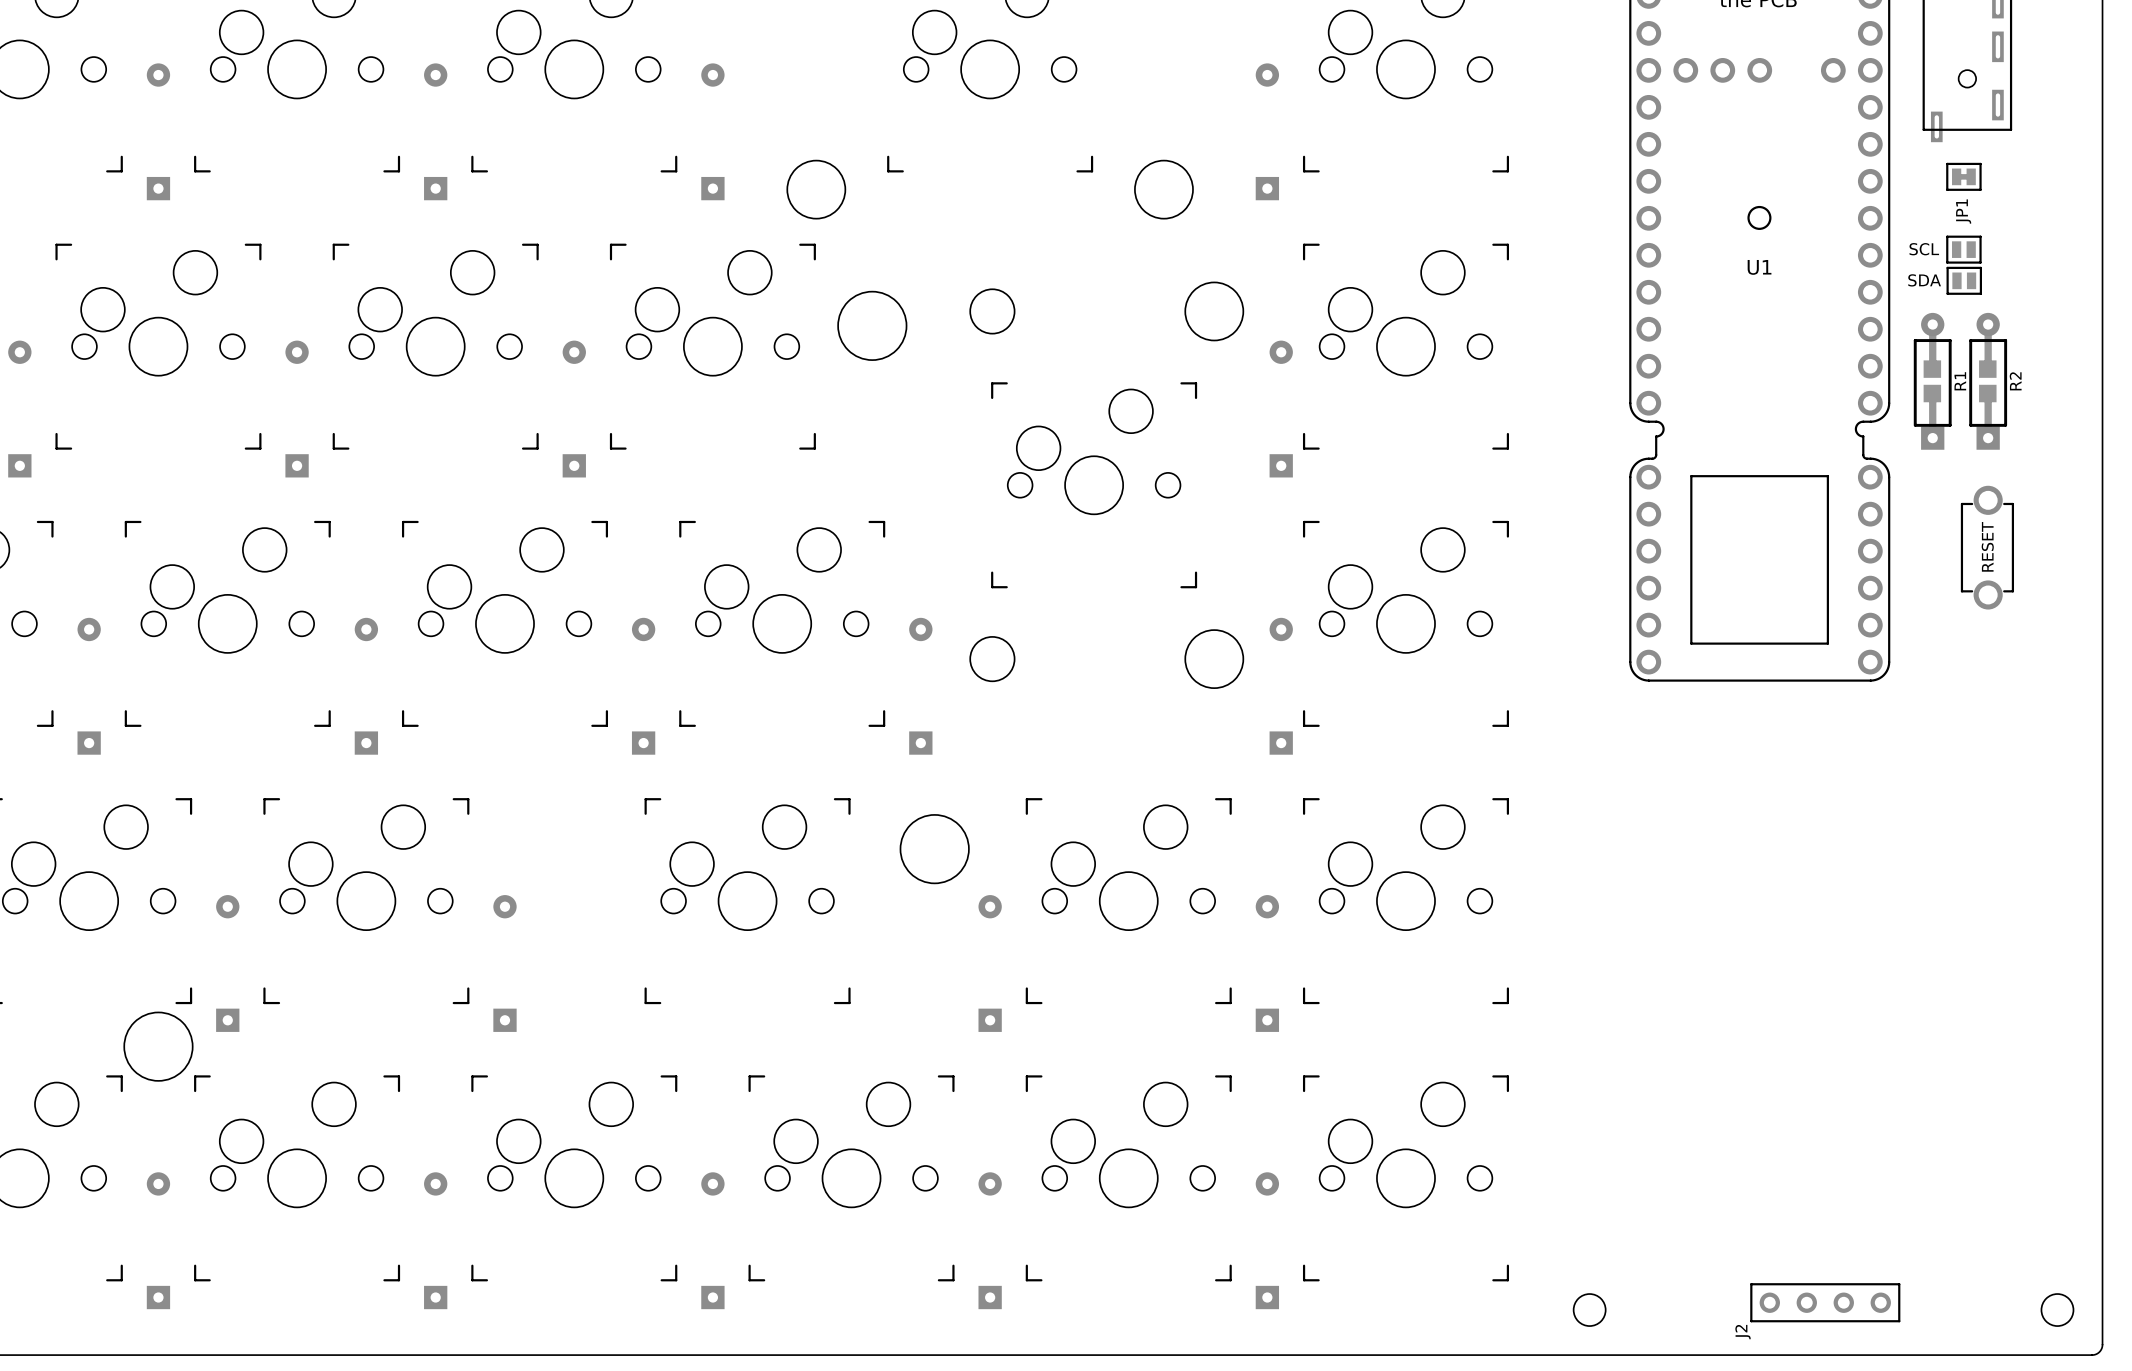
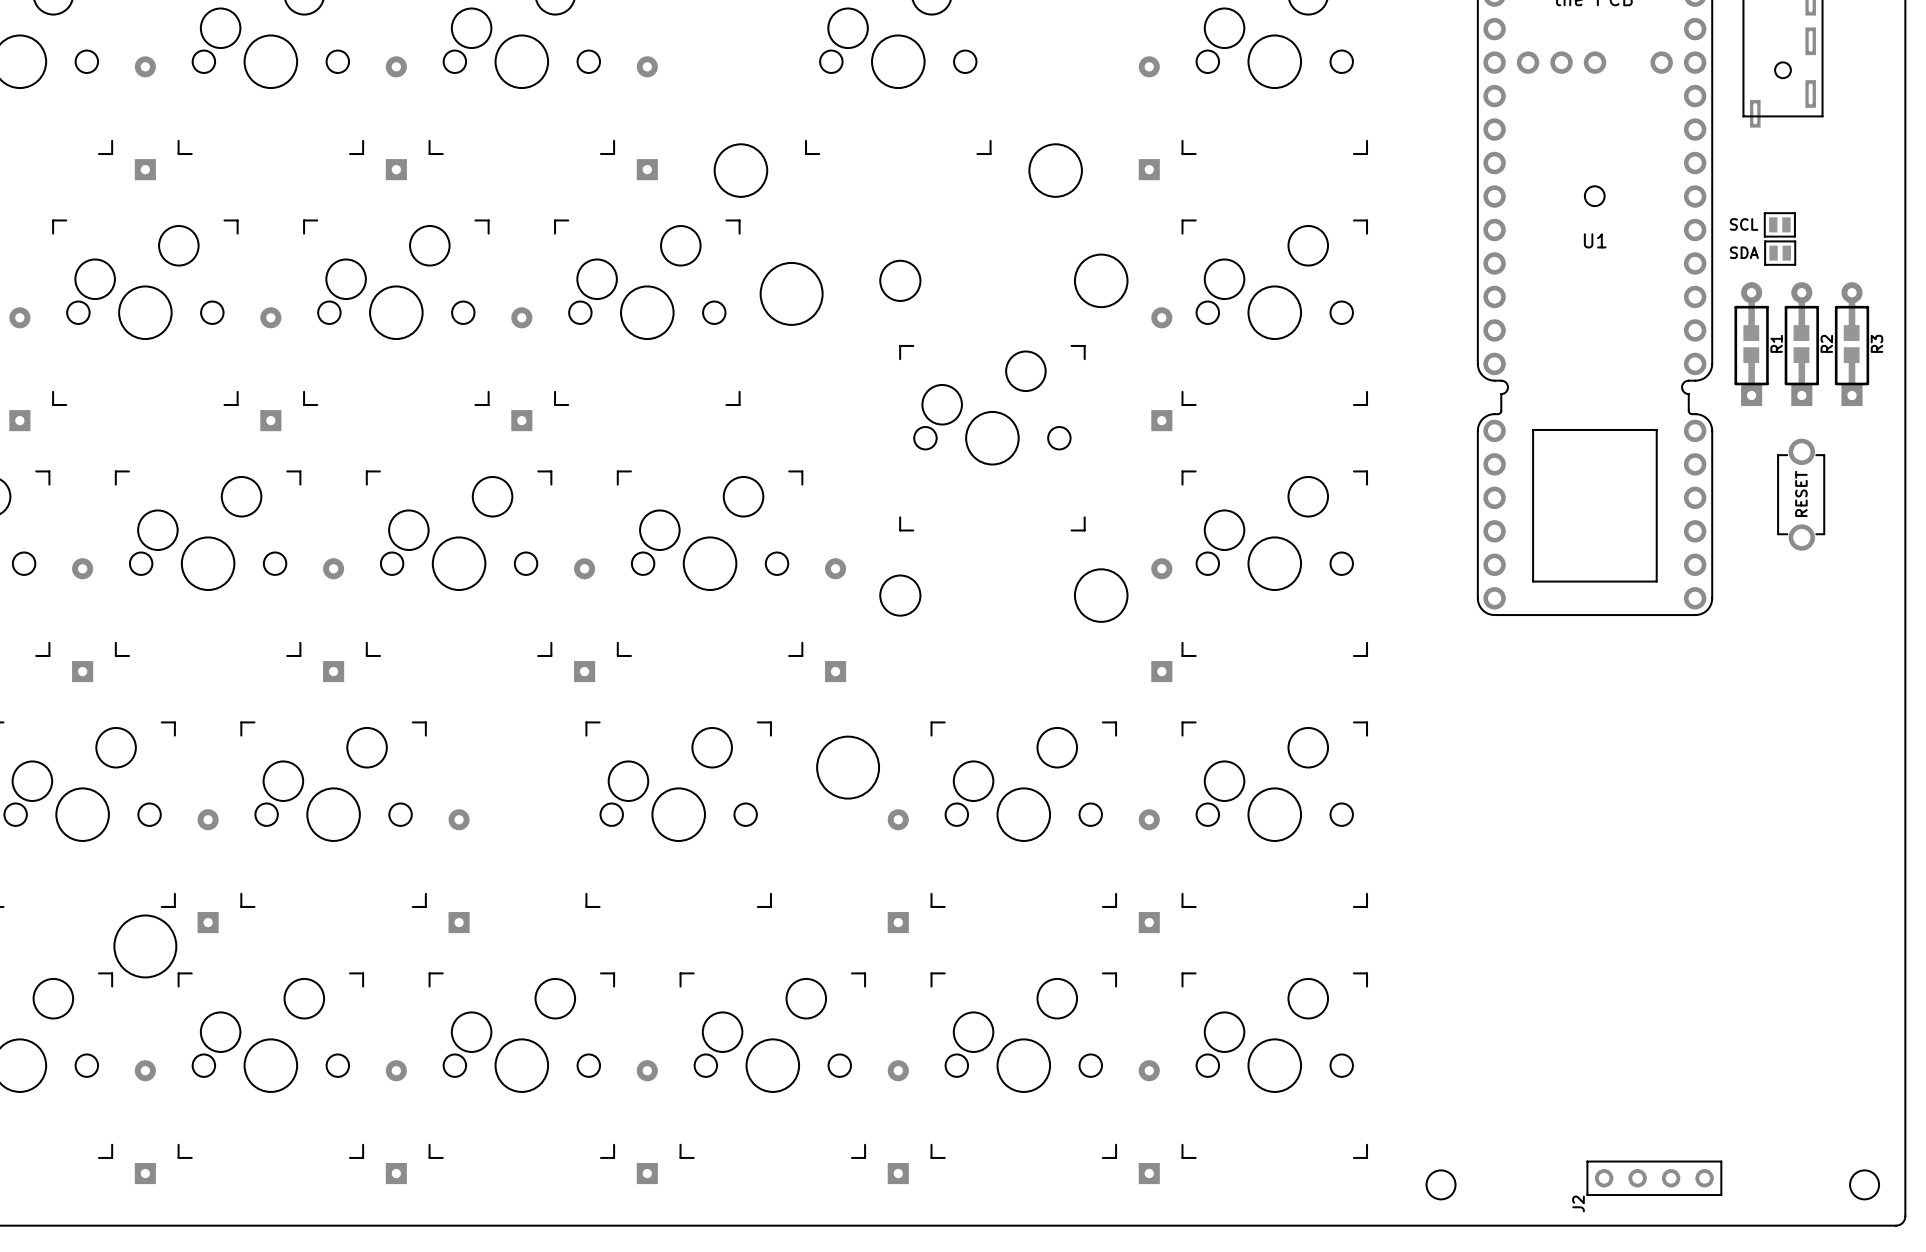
JP1: (1963, 176) -> none
R3: none -> (1852, 344)

